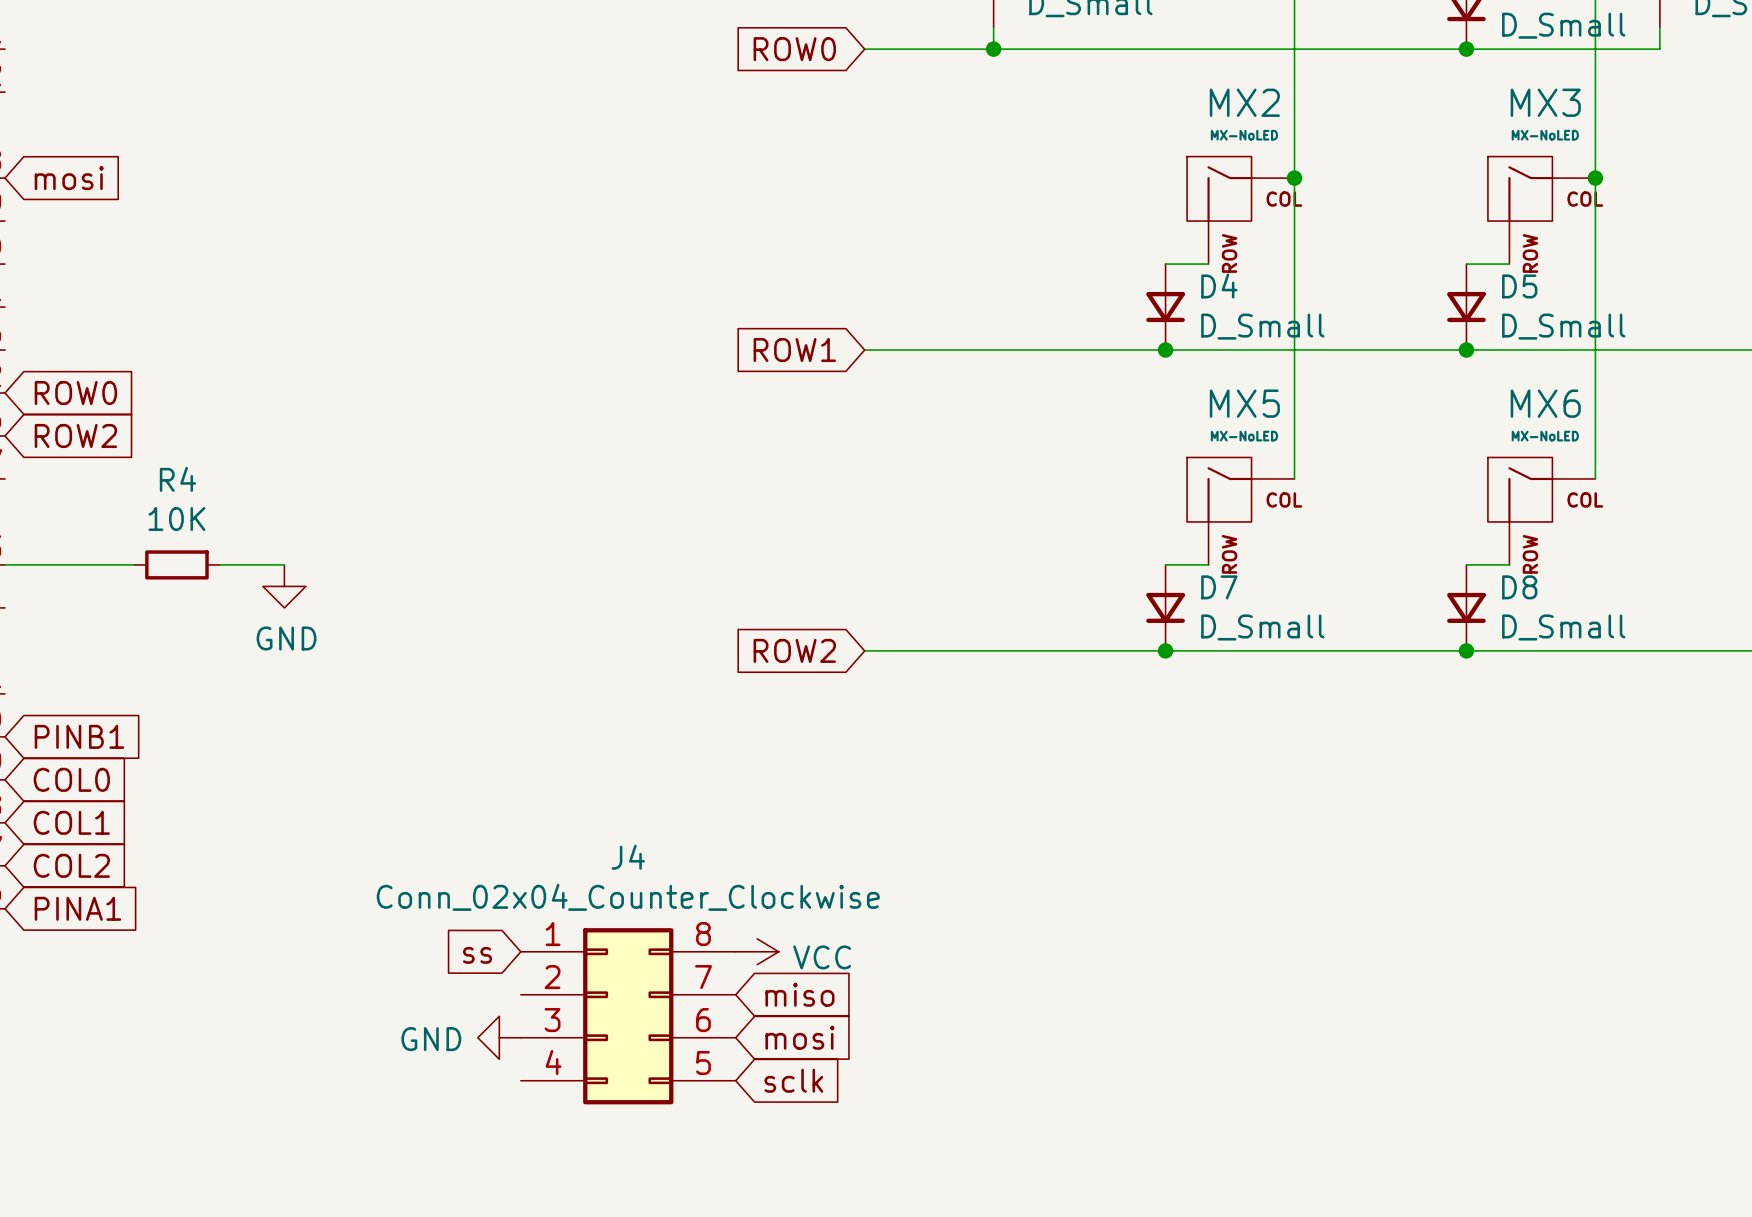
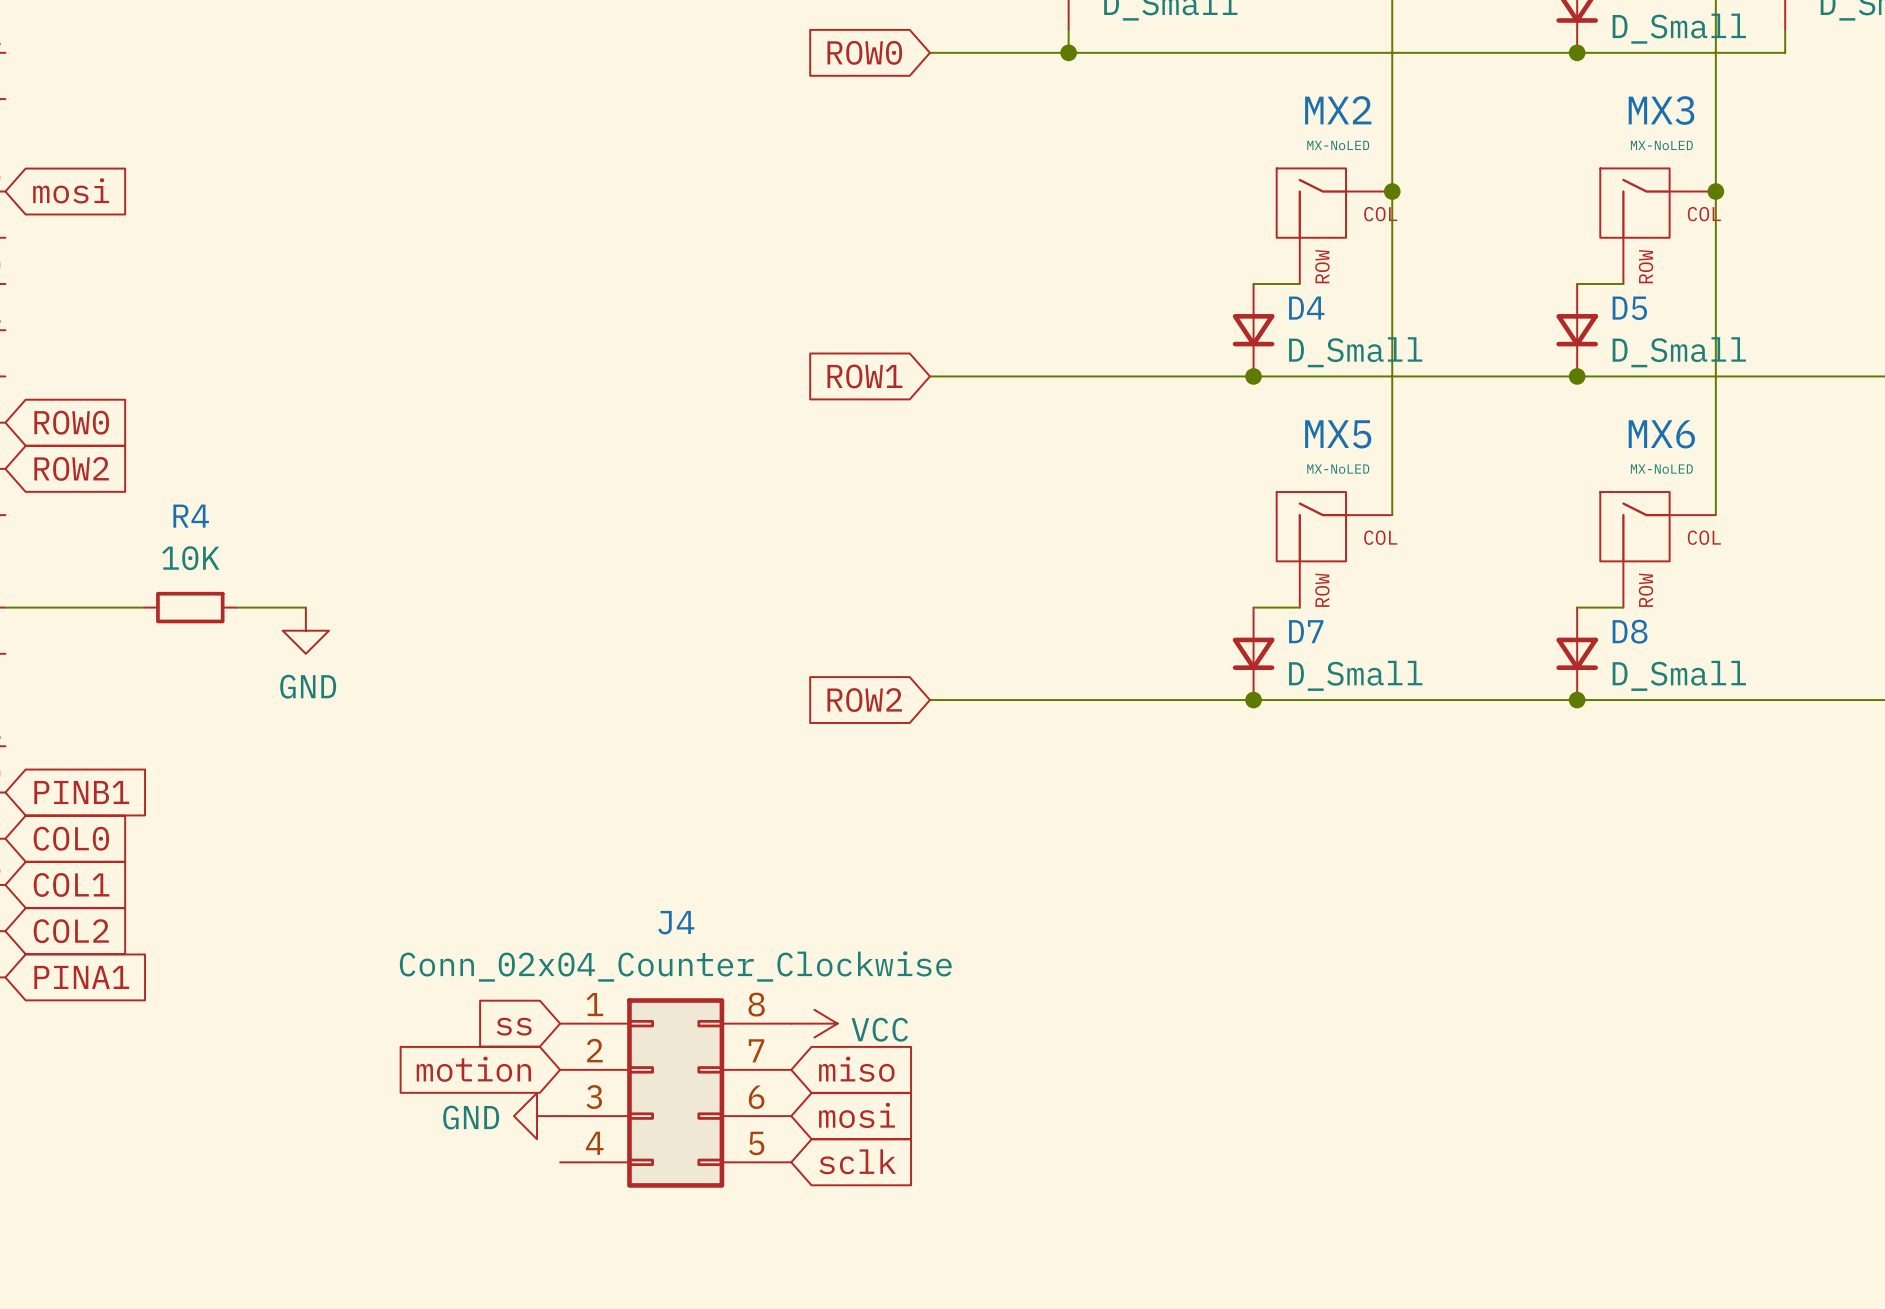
global label: none -> motion (473, 1069)

